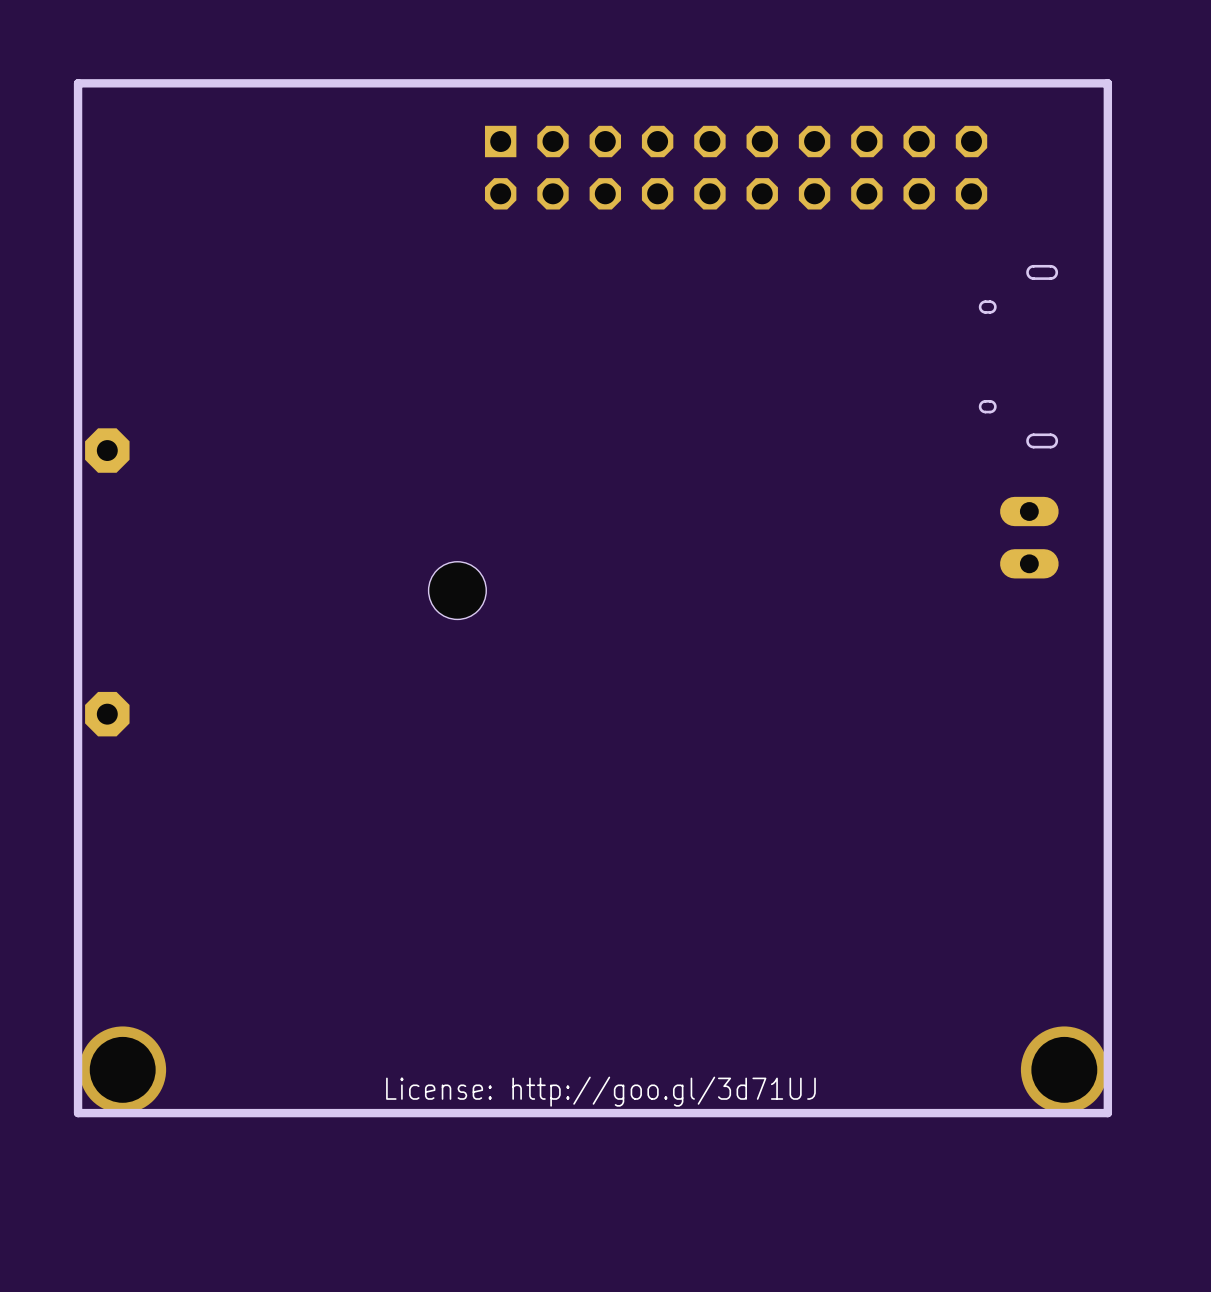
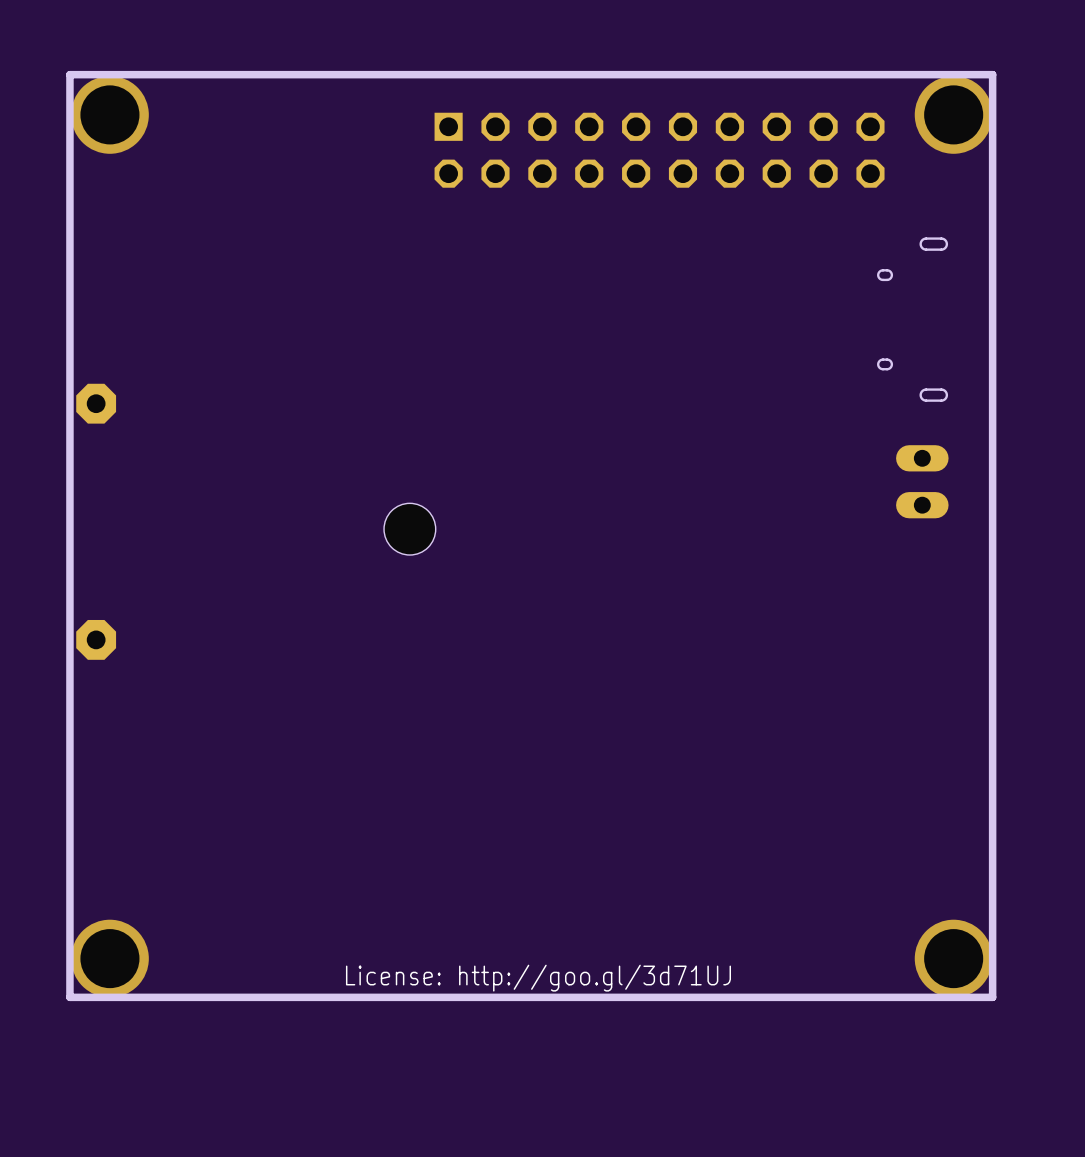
via: none -> (109, 114)
via: none -> (953, 114)

